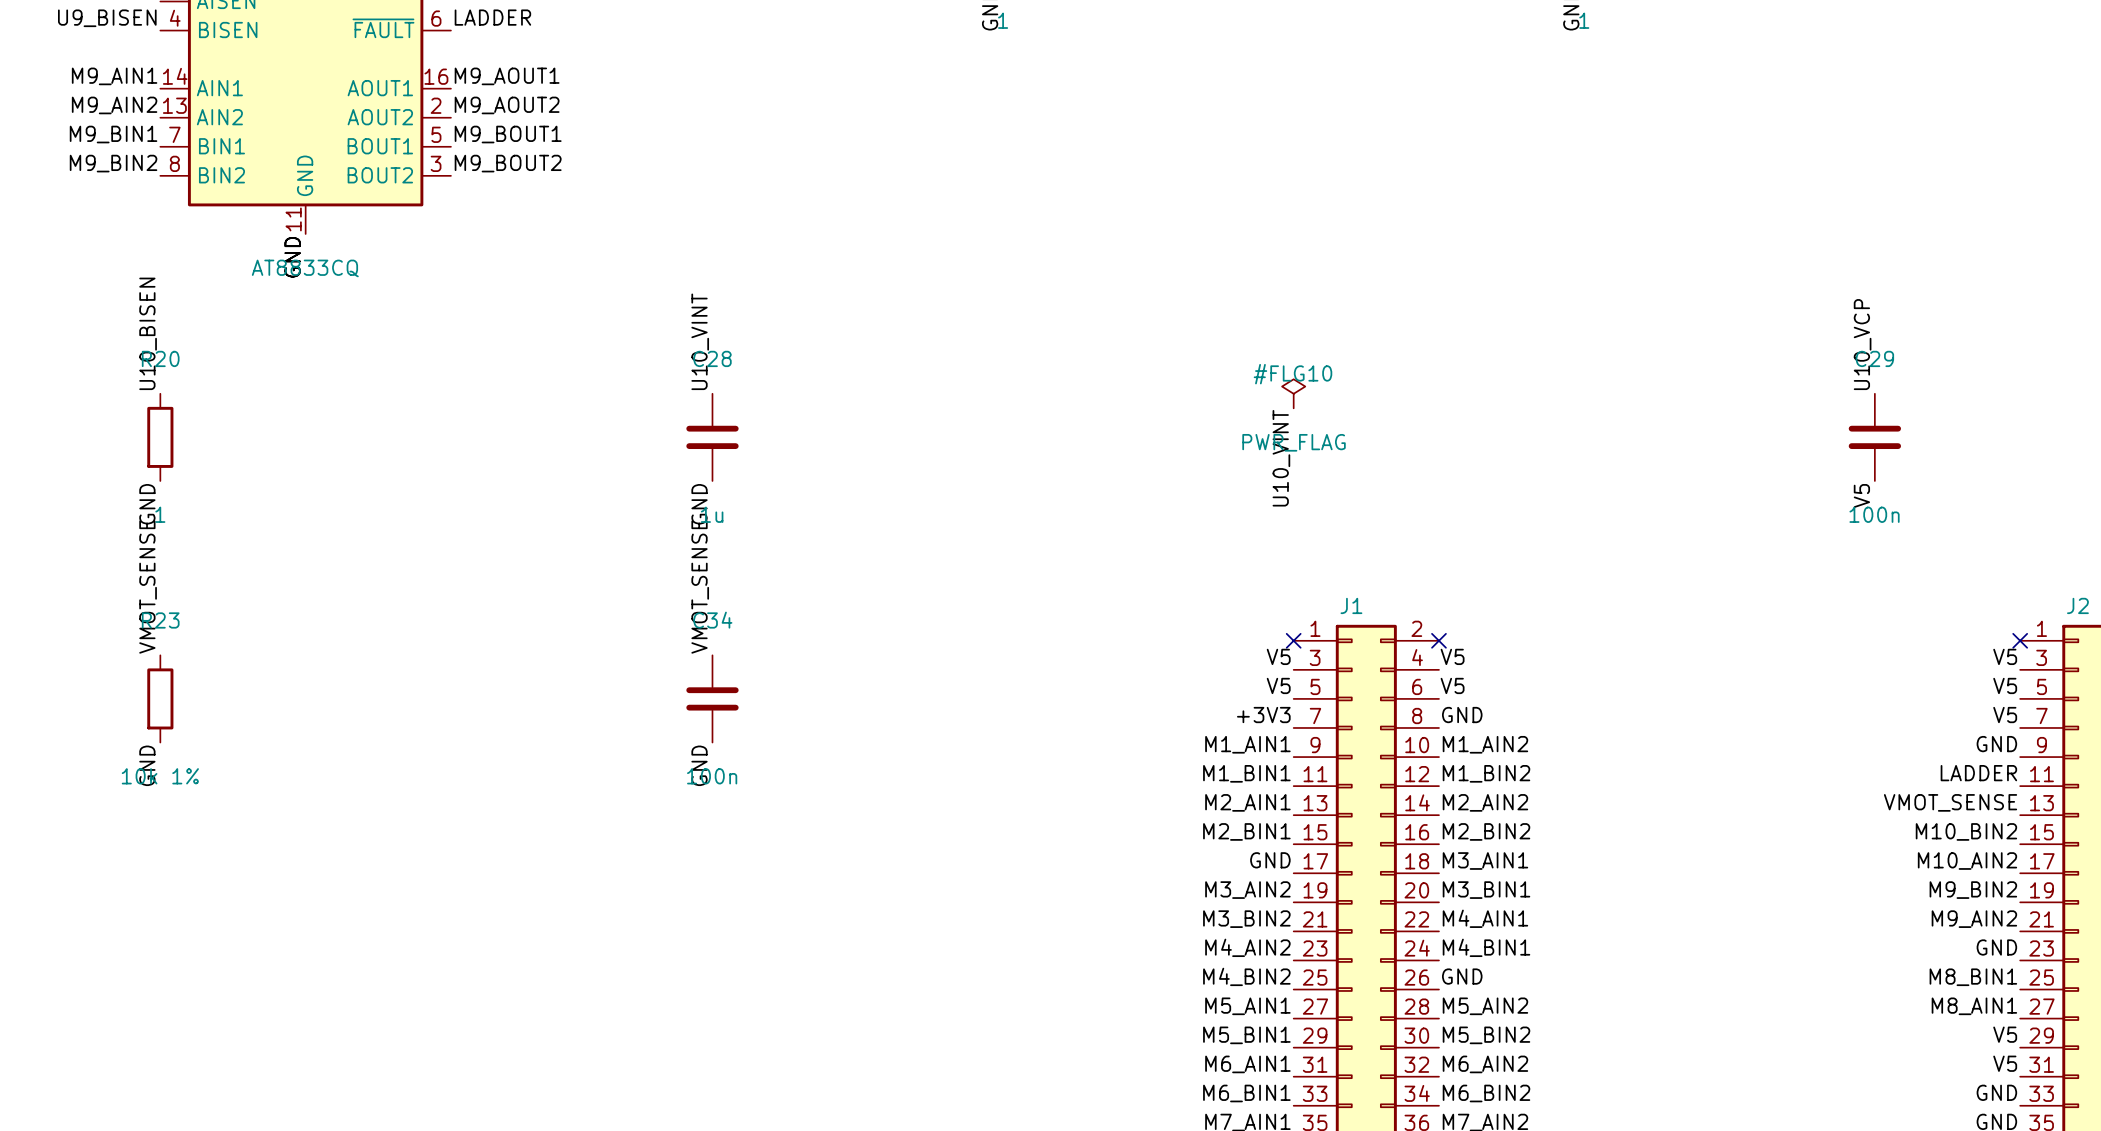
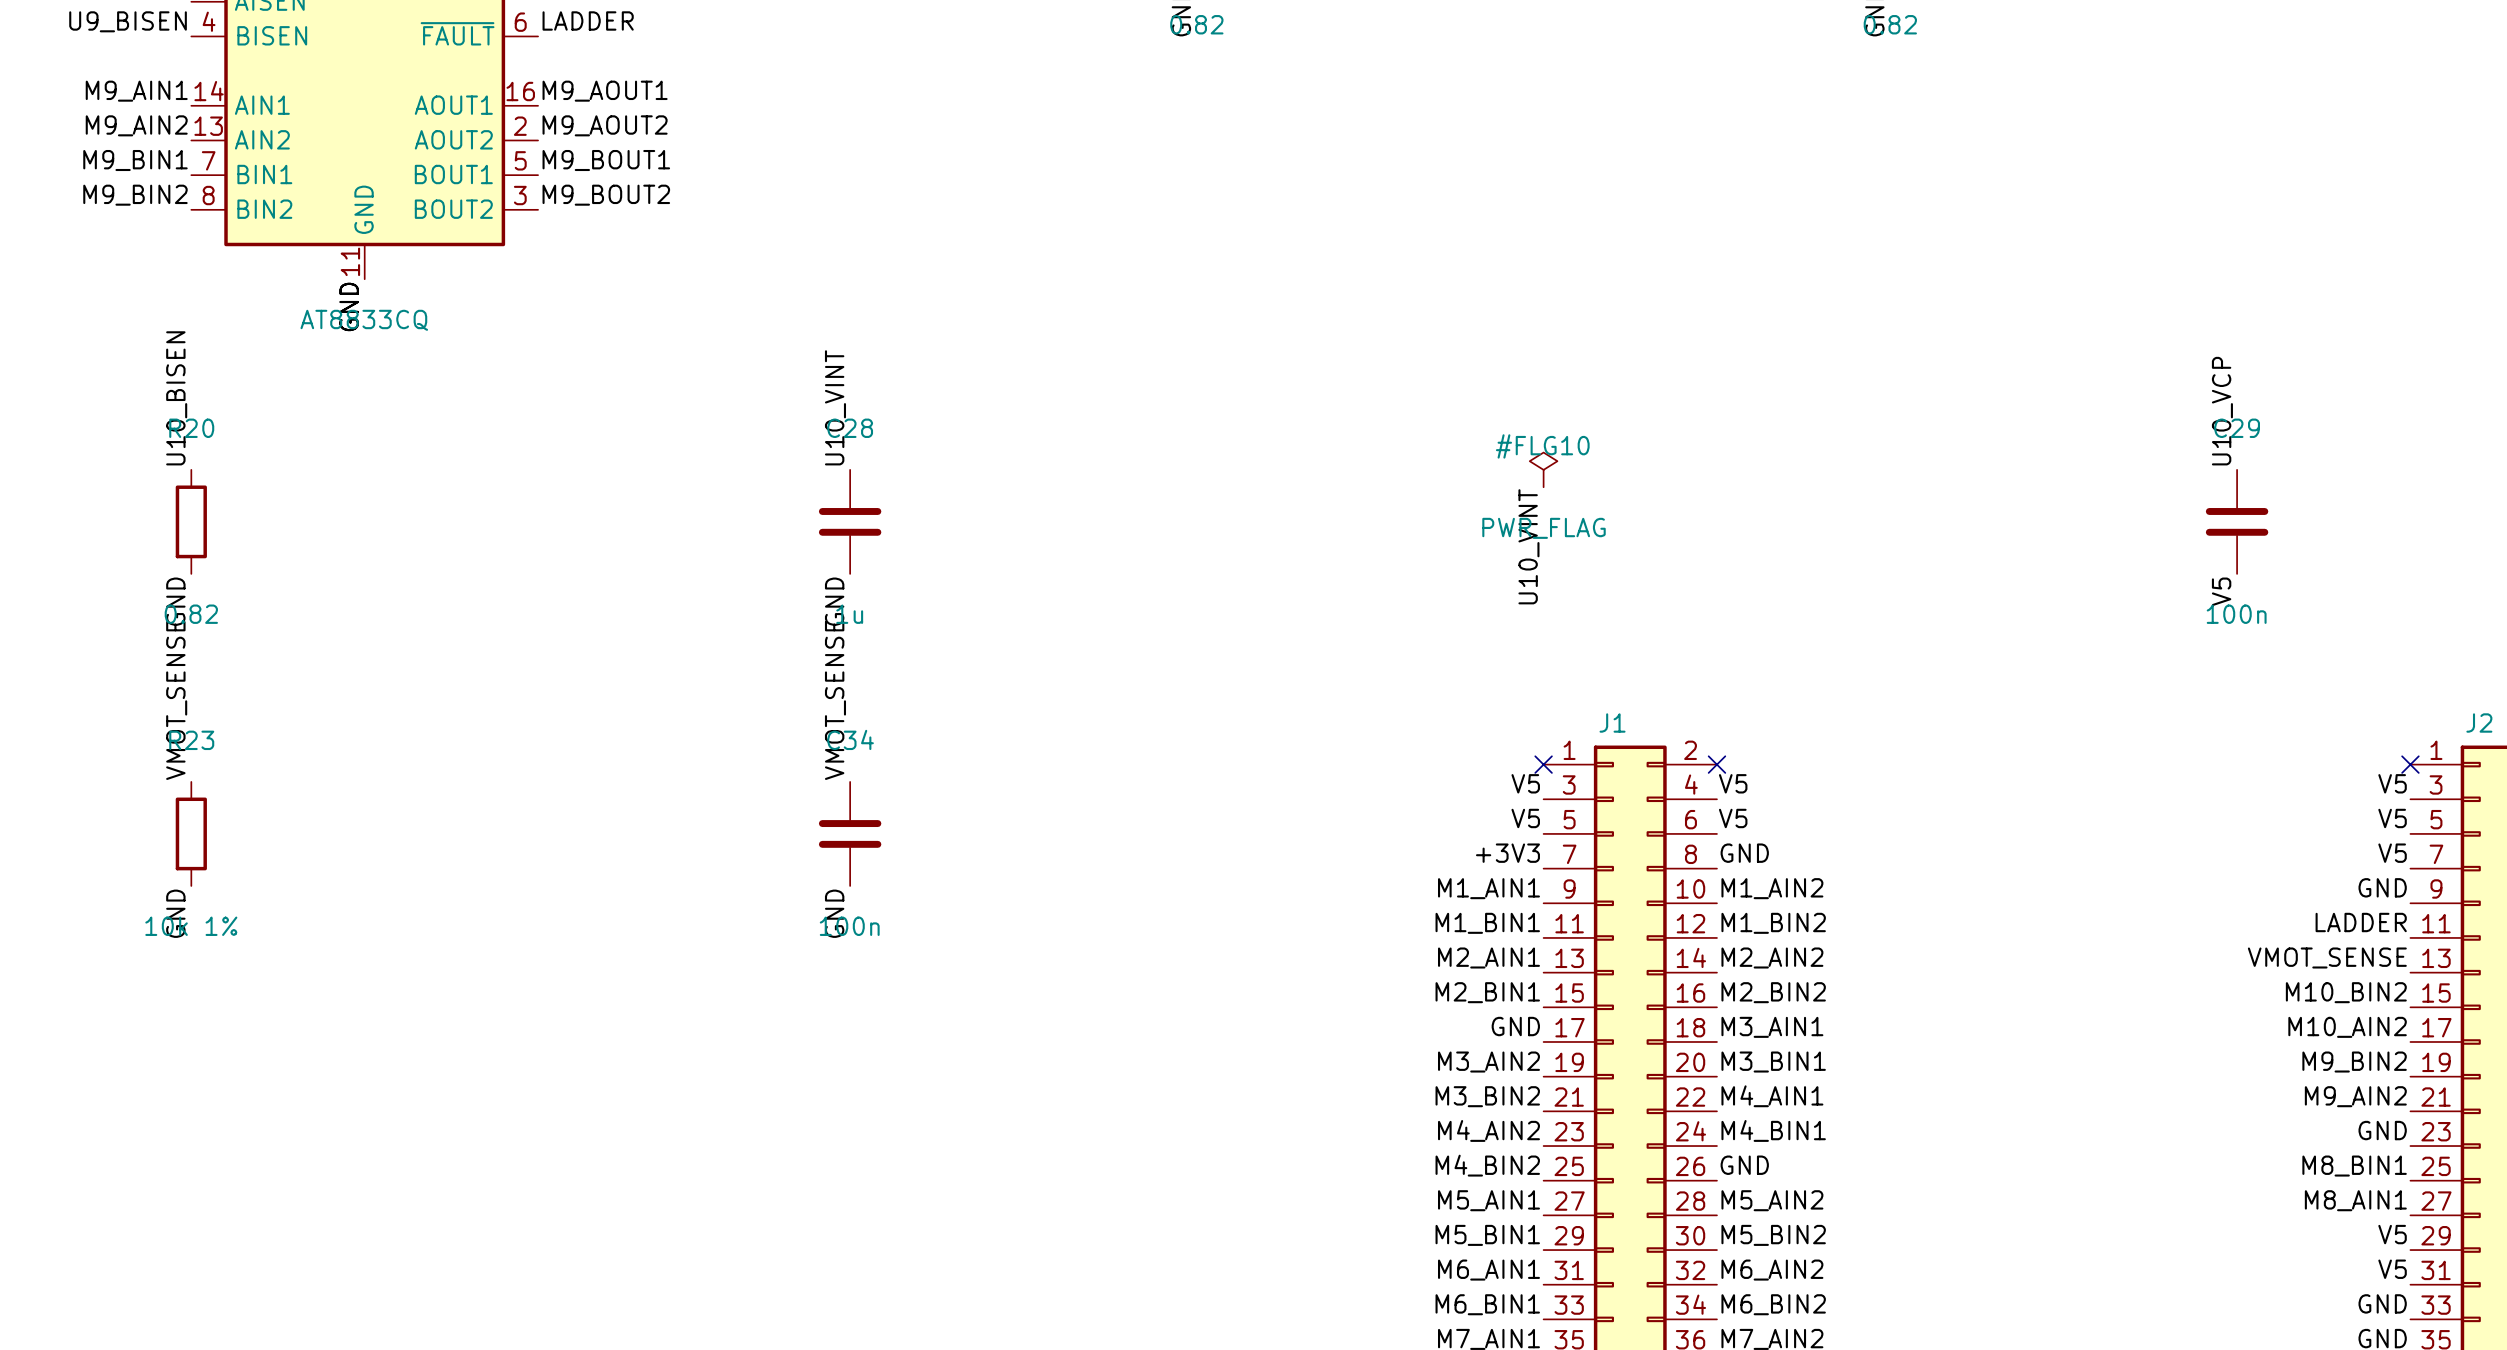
part value: 1 (1003, 20) -> 0.82 (1196, 24)
part value: 1 (1584, 20) -> 0.82 (1890, 24)
R20 value: 1 (160, 514) -> 0.82 (191, 614)

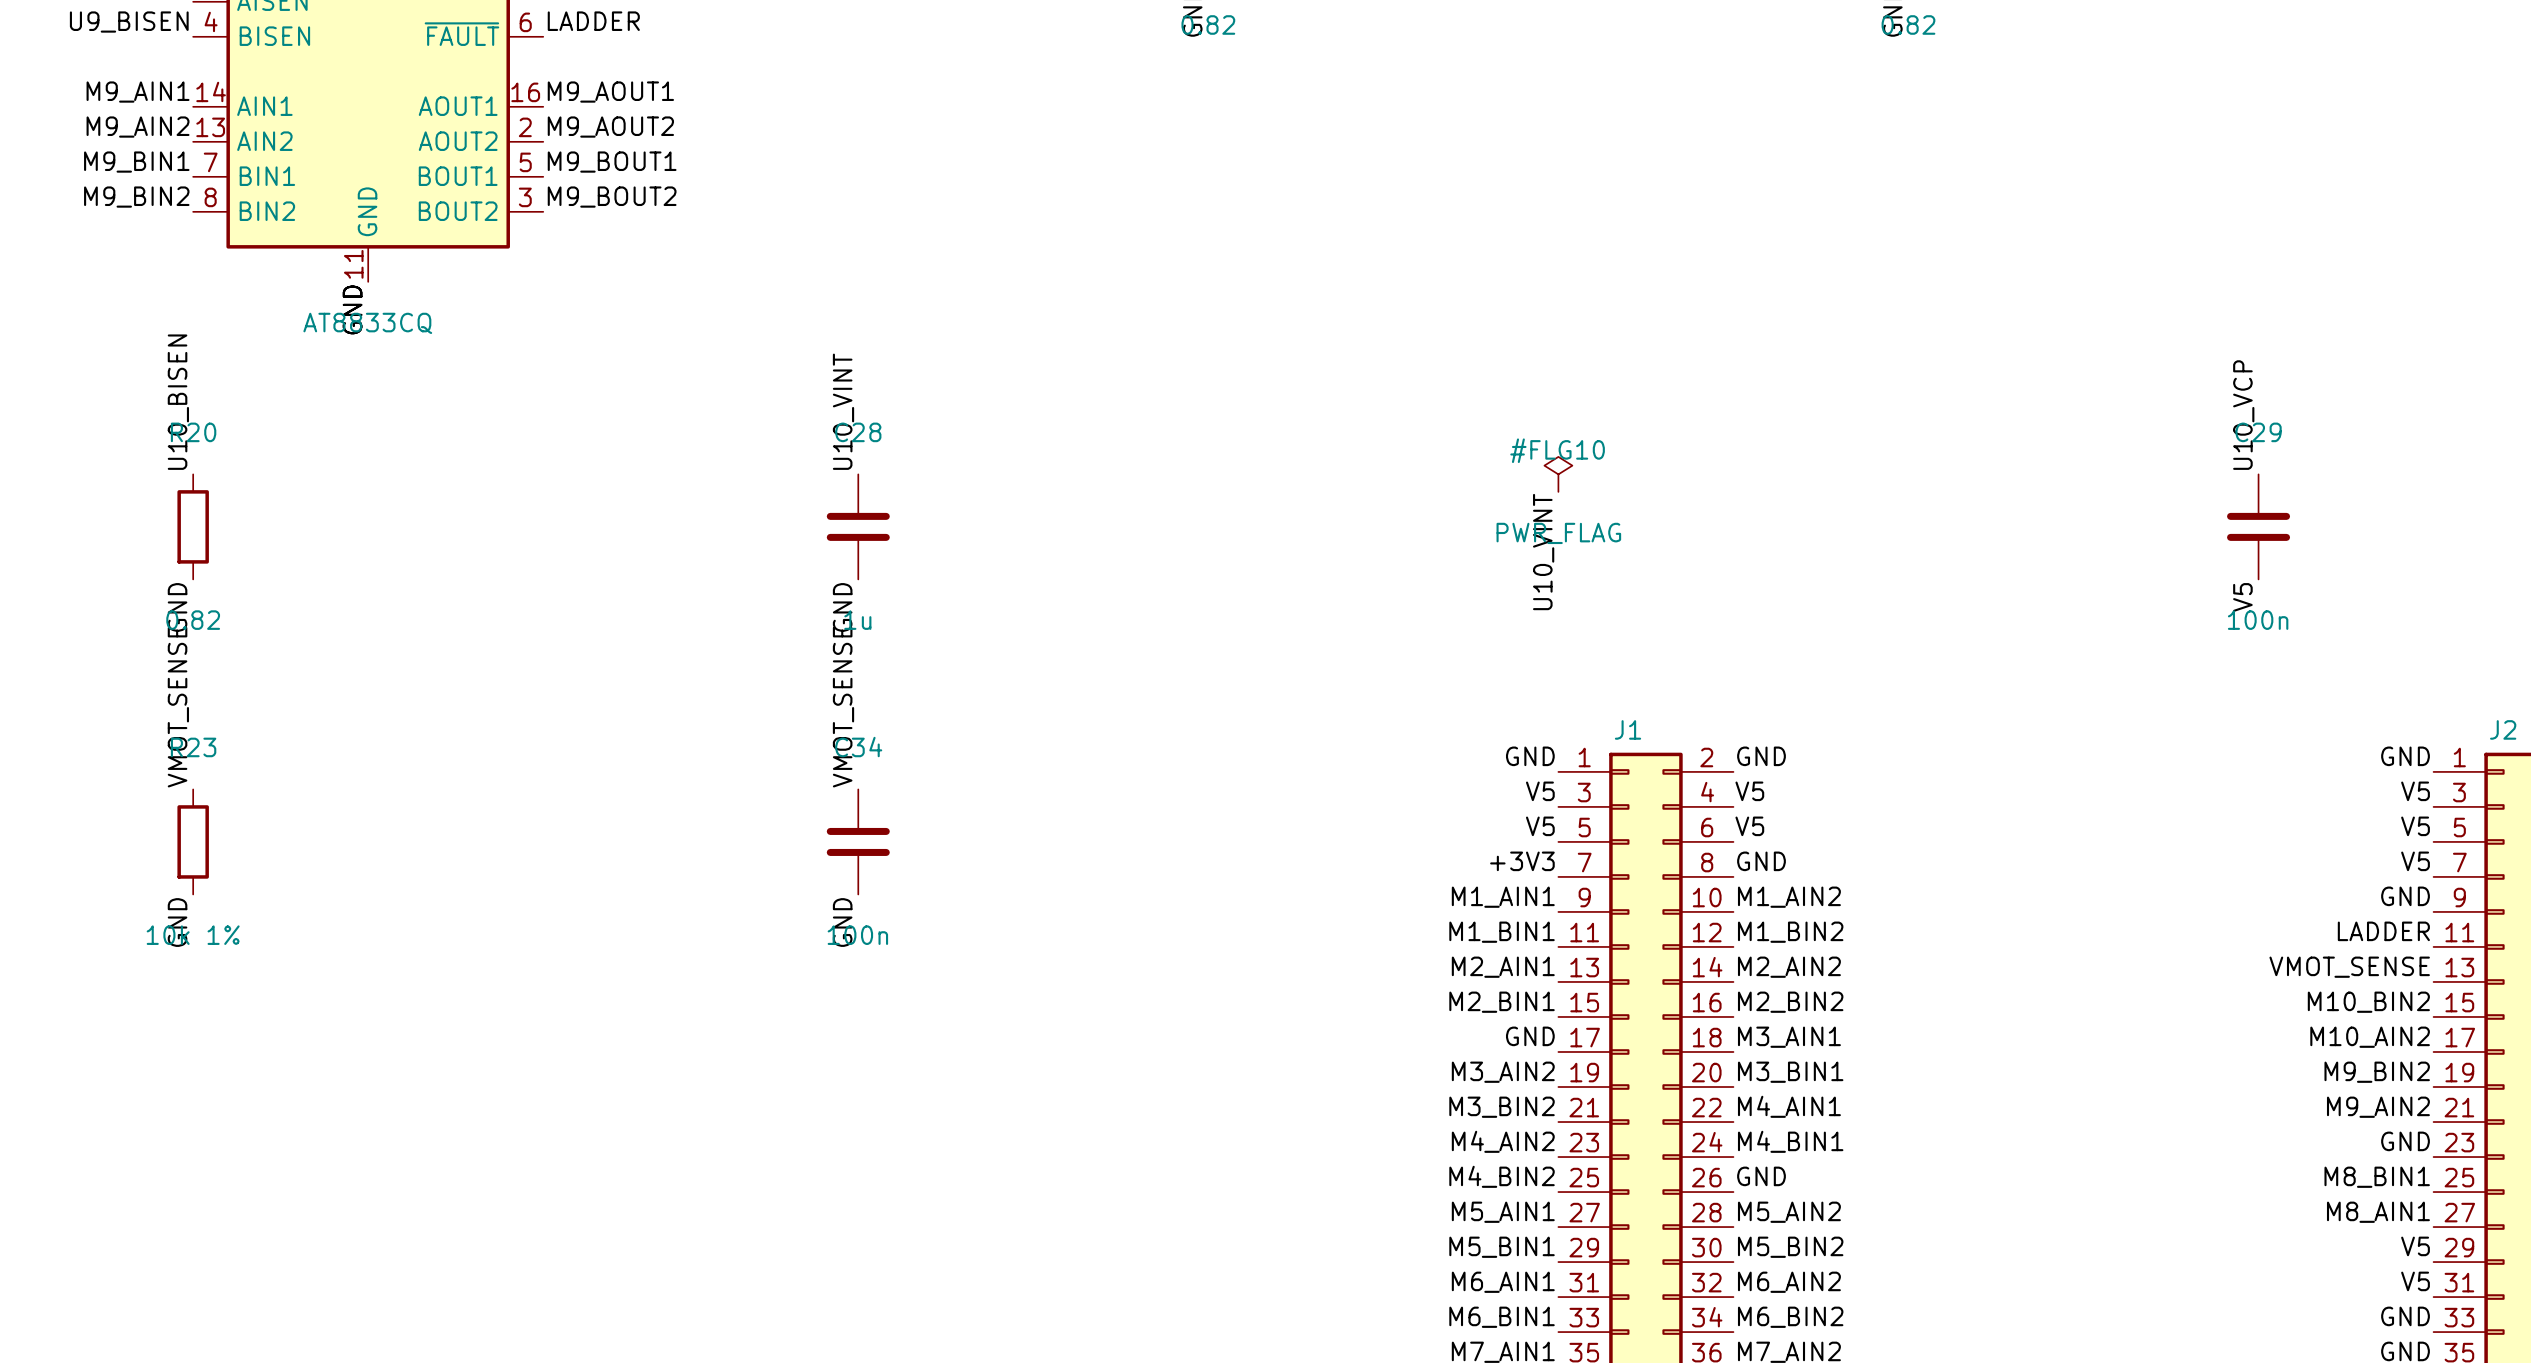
label: none -> GND (1530, 756)
label: none -> GND (1761, 756)
label: none -> GND (2405, 756)
no-connect mark: (1543, 764) -> none
no-connect mark: (1716, 764) -> none
no-connect mark: (2410, 764) -> none

